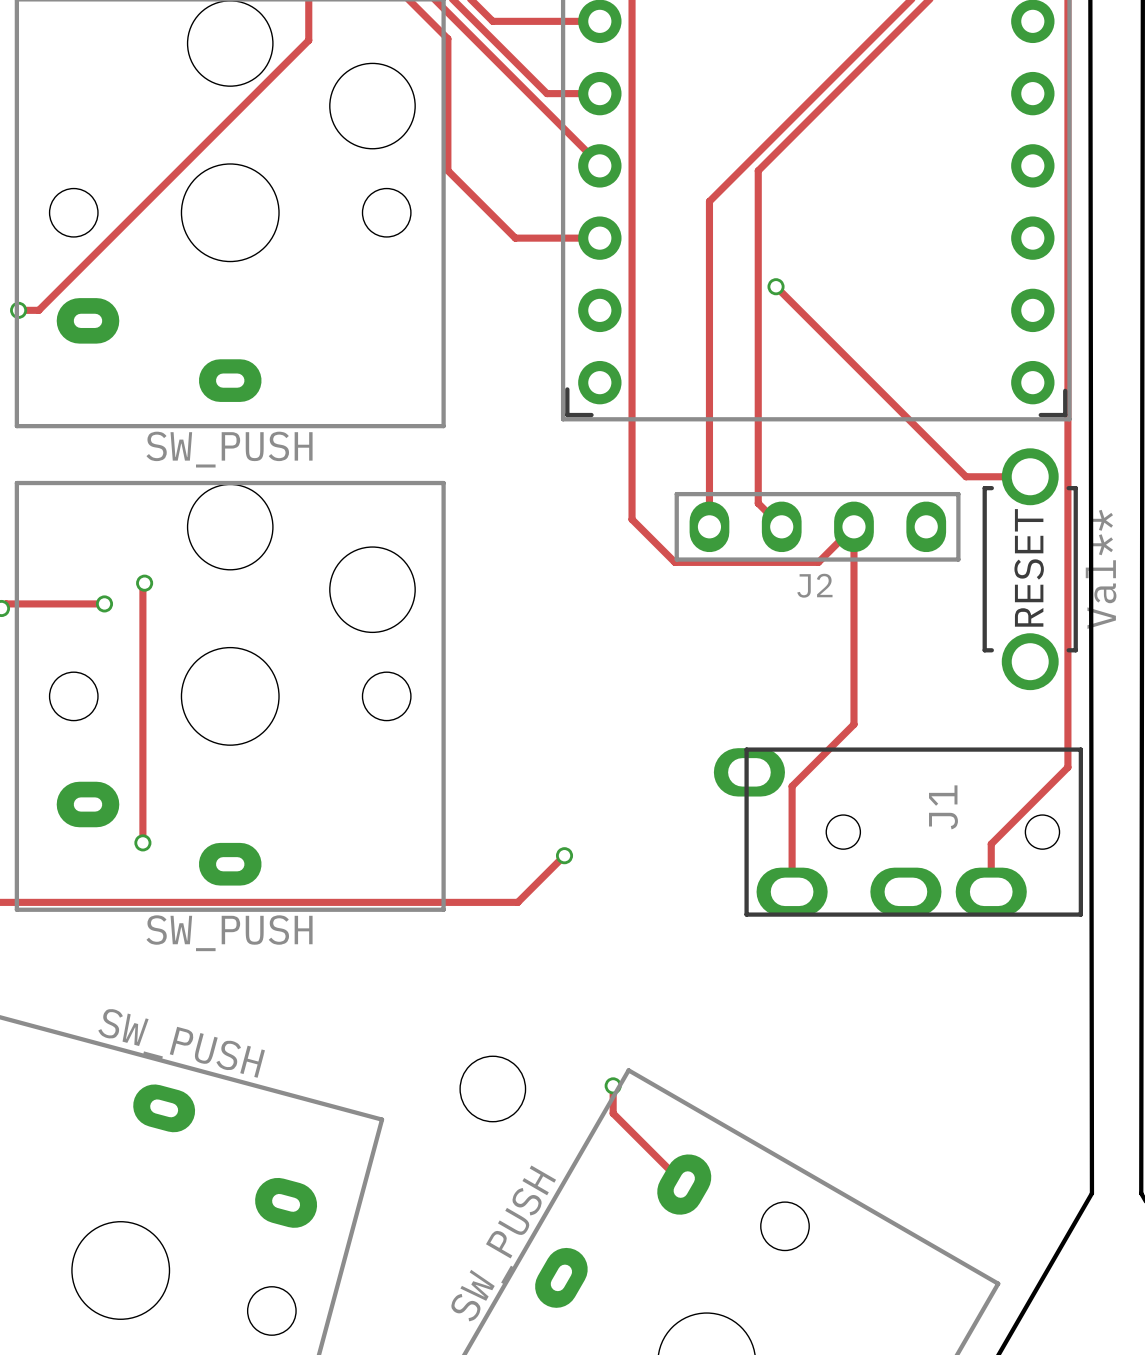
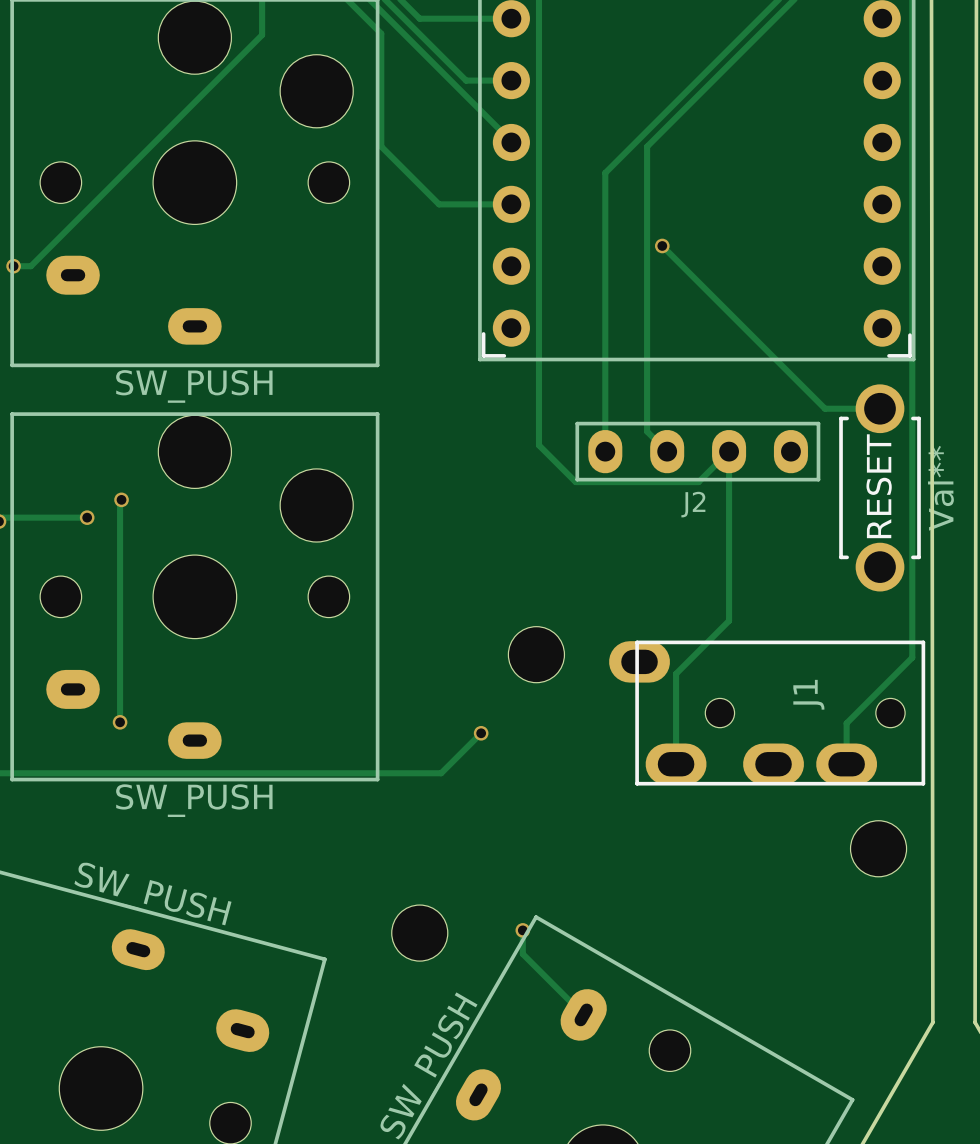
part: none -> (536, 654)
part: none -> (878, 848)

